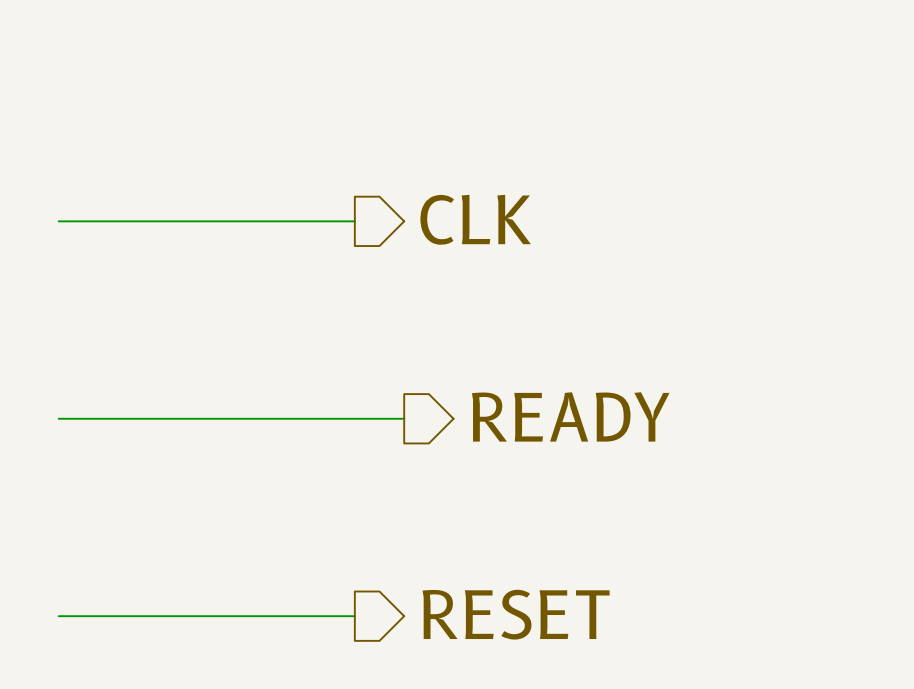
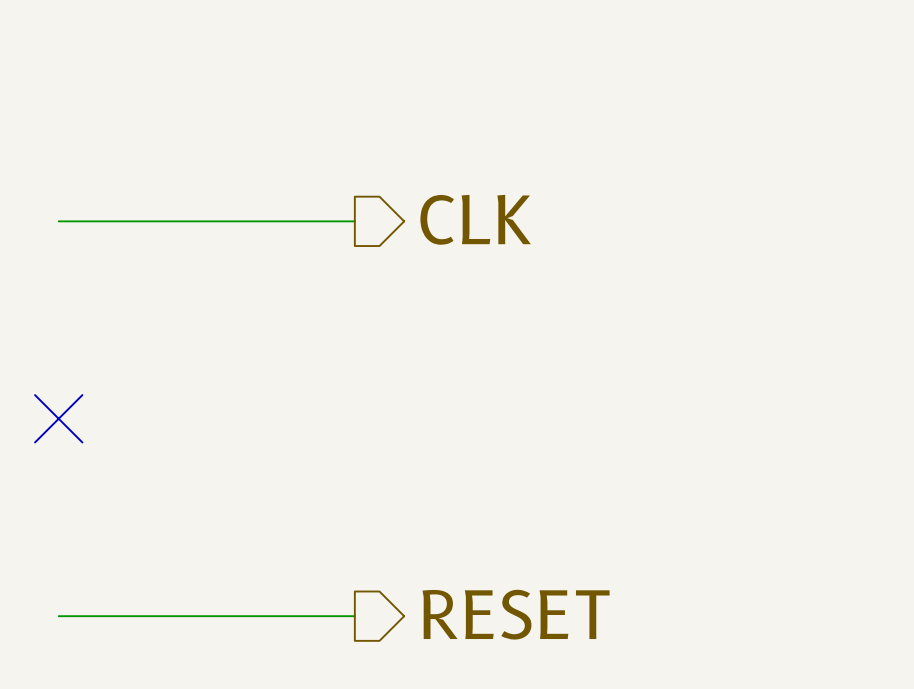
hierarchical label: READY (570, 416) -> none
wire: (58, 418) (404, 418) -> none
no-connect mark: none -> (58, 418)

